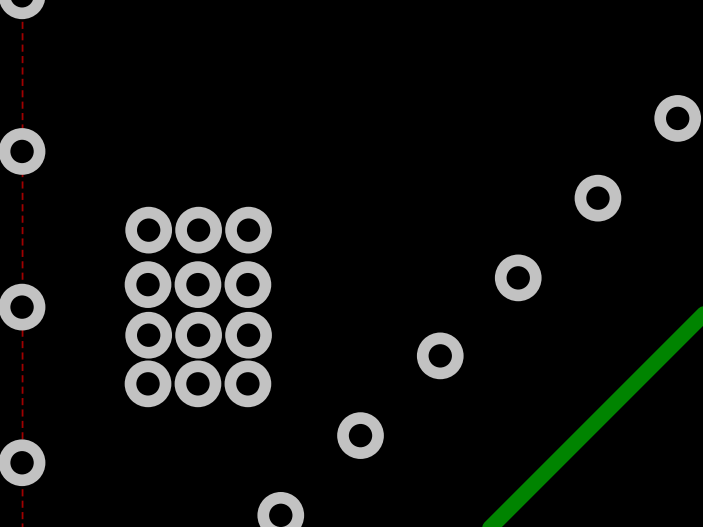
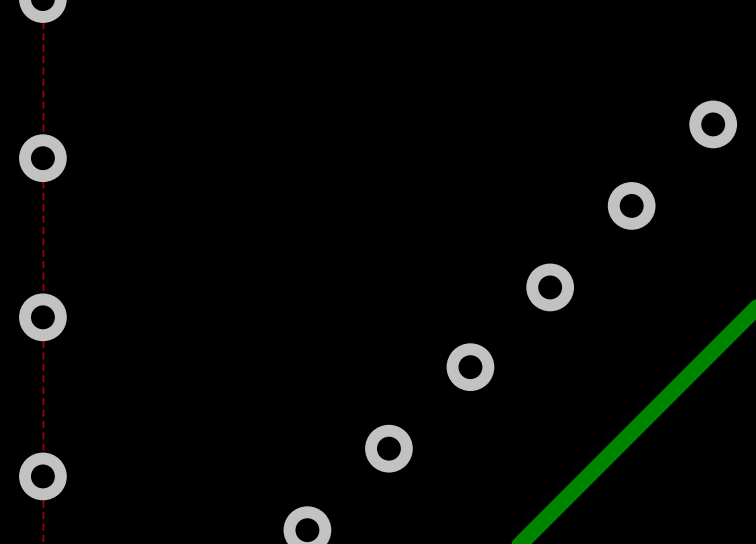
via: (148, 230) -> none
via: (198, 230) -> none
via: (248, 230) -> none
via: (148, 284) -> none
via: (197, 284) -> none
via: (247, 284) -> none
via: (148, 335) -> none
via: (198, 335) -> none
via: (248, 335) -> none
via: (148, 383) -> none
via: (197, 383) -> none
via: (247, 383) -> none

